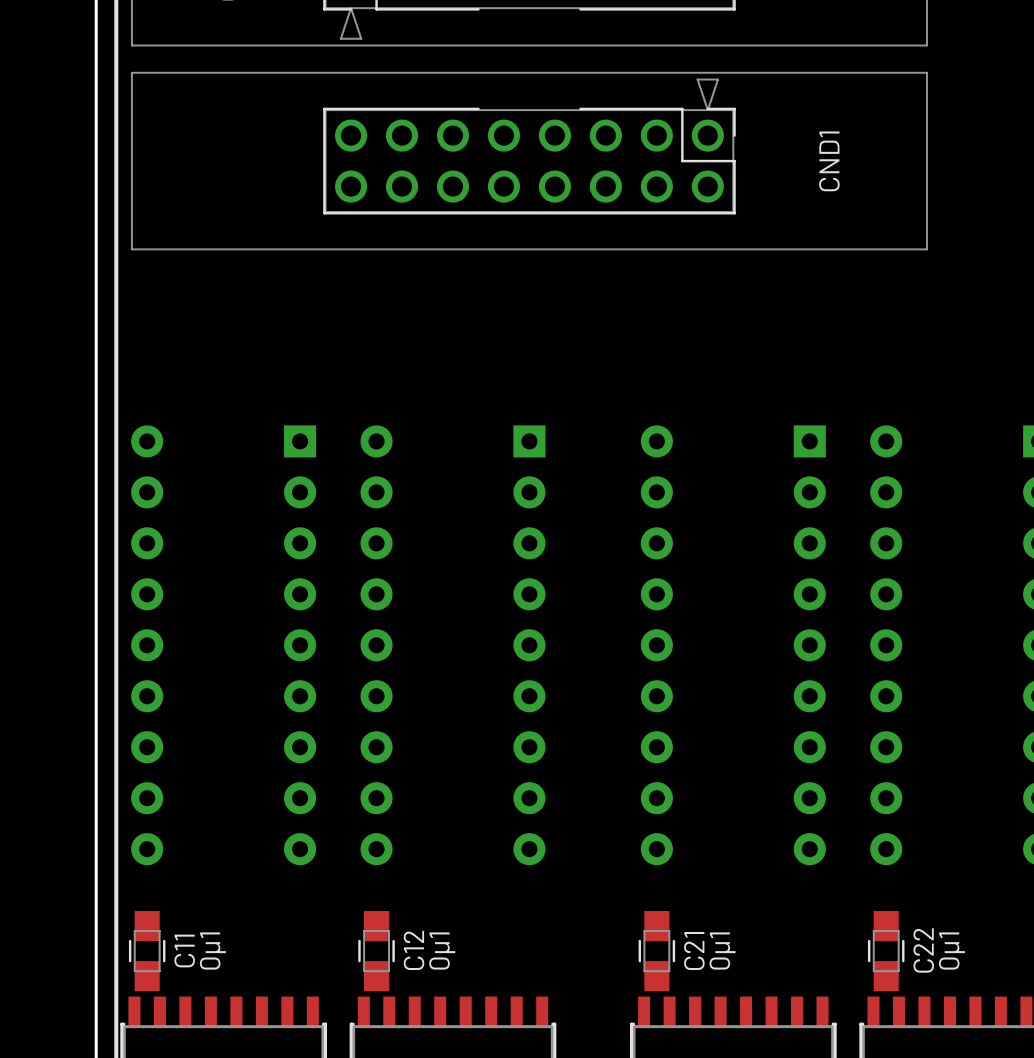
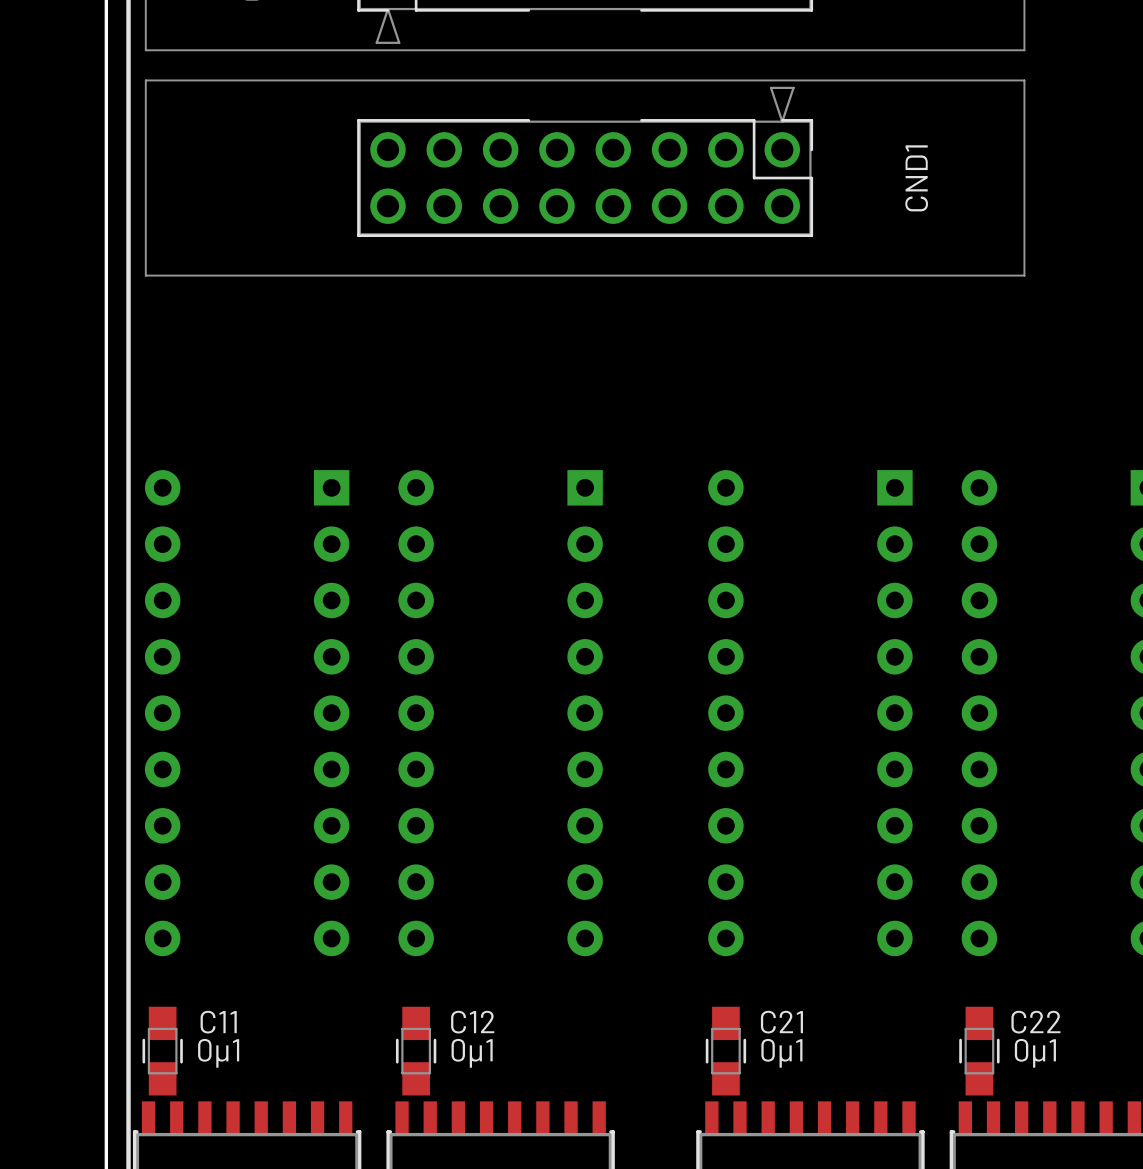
C11 name rotation: 0° (184, 950) -> 90° clockwise (218, 1022)
C12 name rotation: 0° (414, 950) -> 90° clockwise (472, 1022)
C21 name rotation: 0° (694, 950) -> 90° clockwise (781, 1022)
C22 name rotation: 0° (923, 950) -> 90° clockwise (1035, 1022)
C11 value rotation: 0° (212, 951) -> 90° clockwise (218, 1053)
C12 value rotation: 0° (442, 951) -> 90° clockwise (472, 1053)
C21 value rotation: 0° (722, 951) -> 90° clockwise (781, 1053)
C22 value rotation: 0° (951, 951) -> 90° clockwise (1035, 1053)

